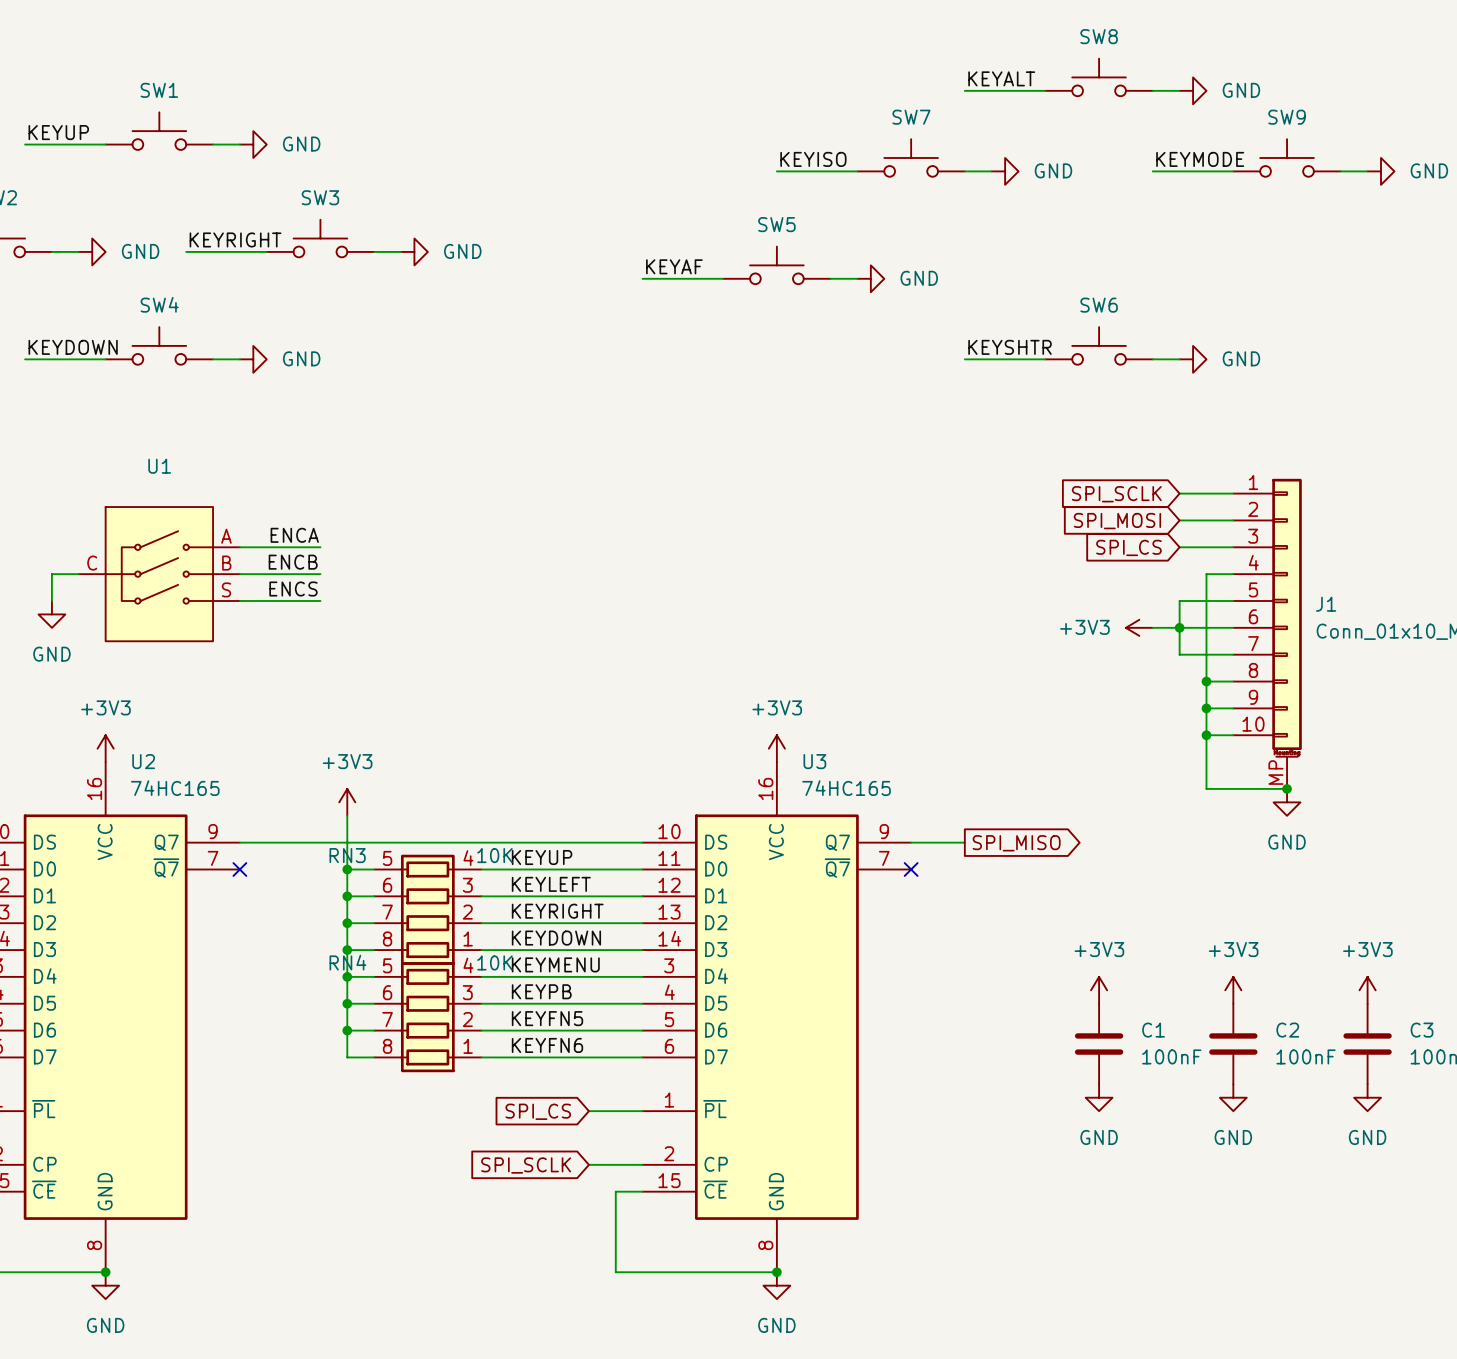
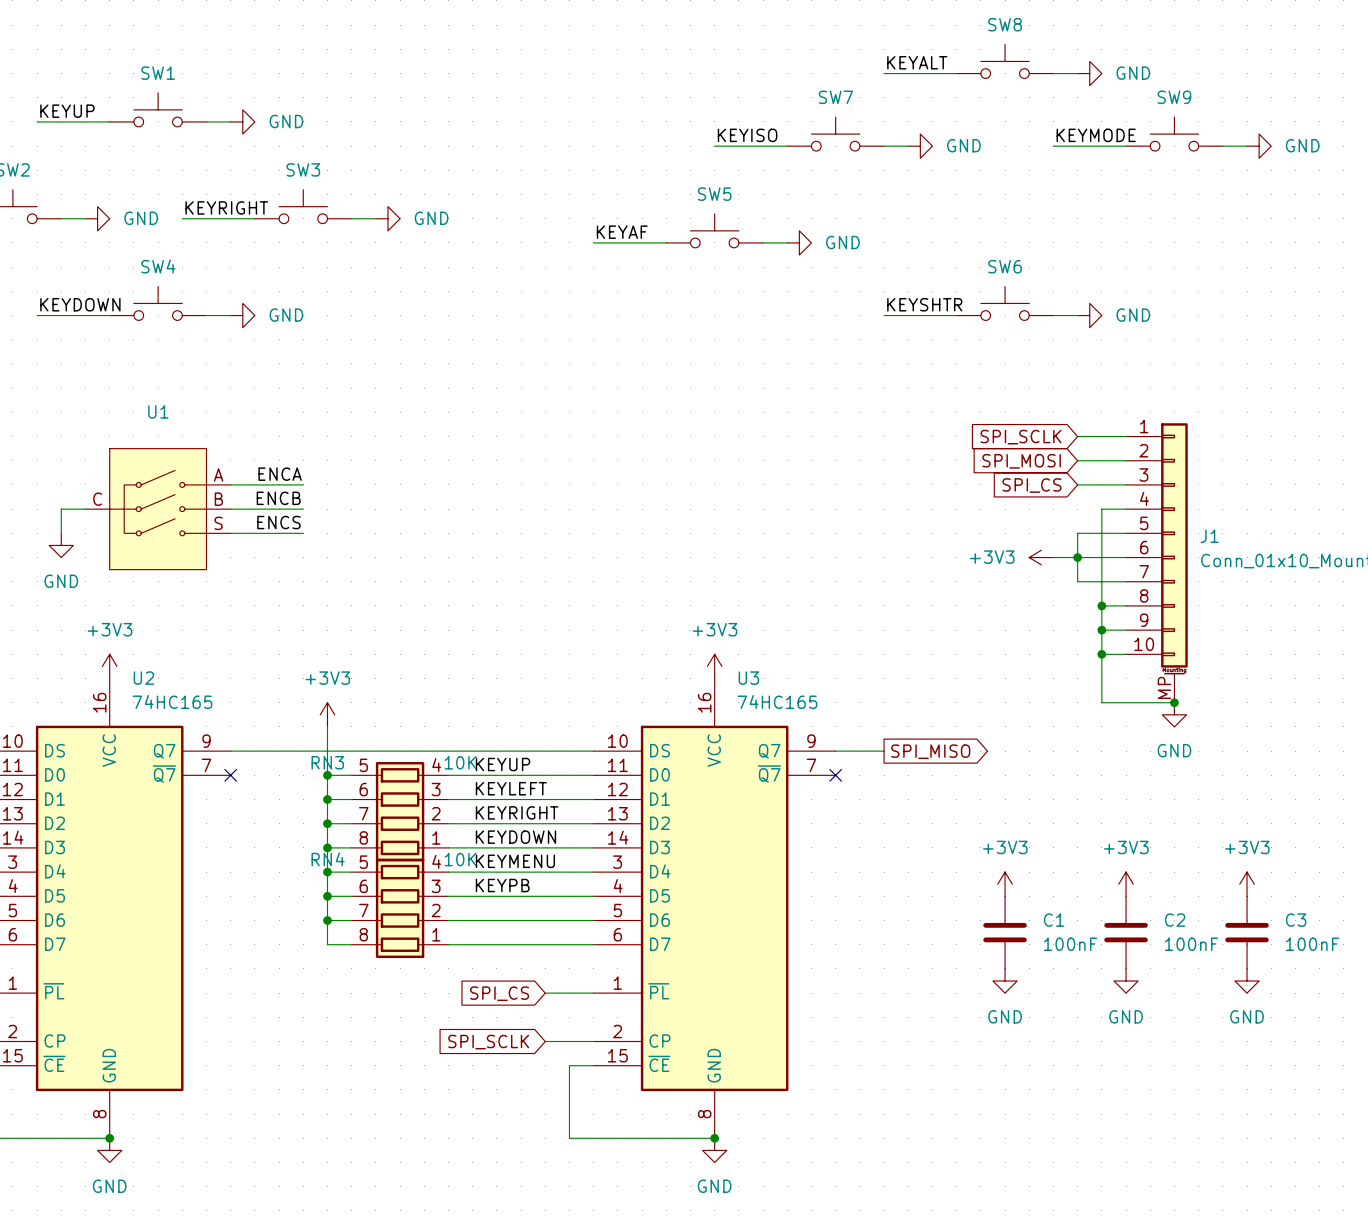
label: KEYFN5 (547, 1018) -> none
label: KEYFN6 (547, 1045) -> none

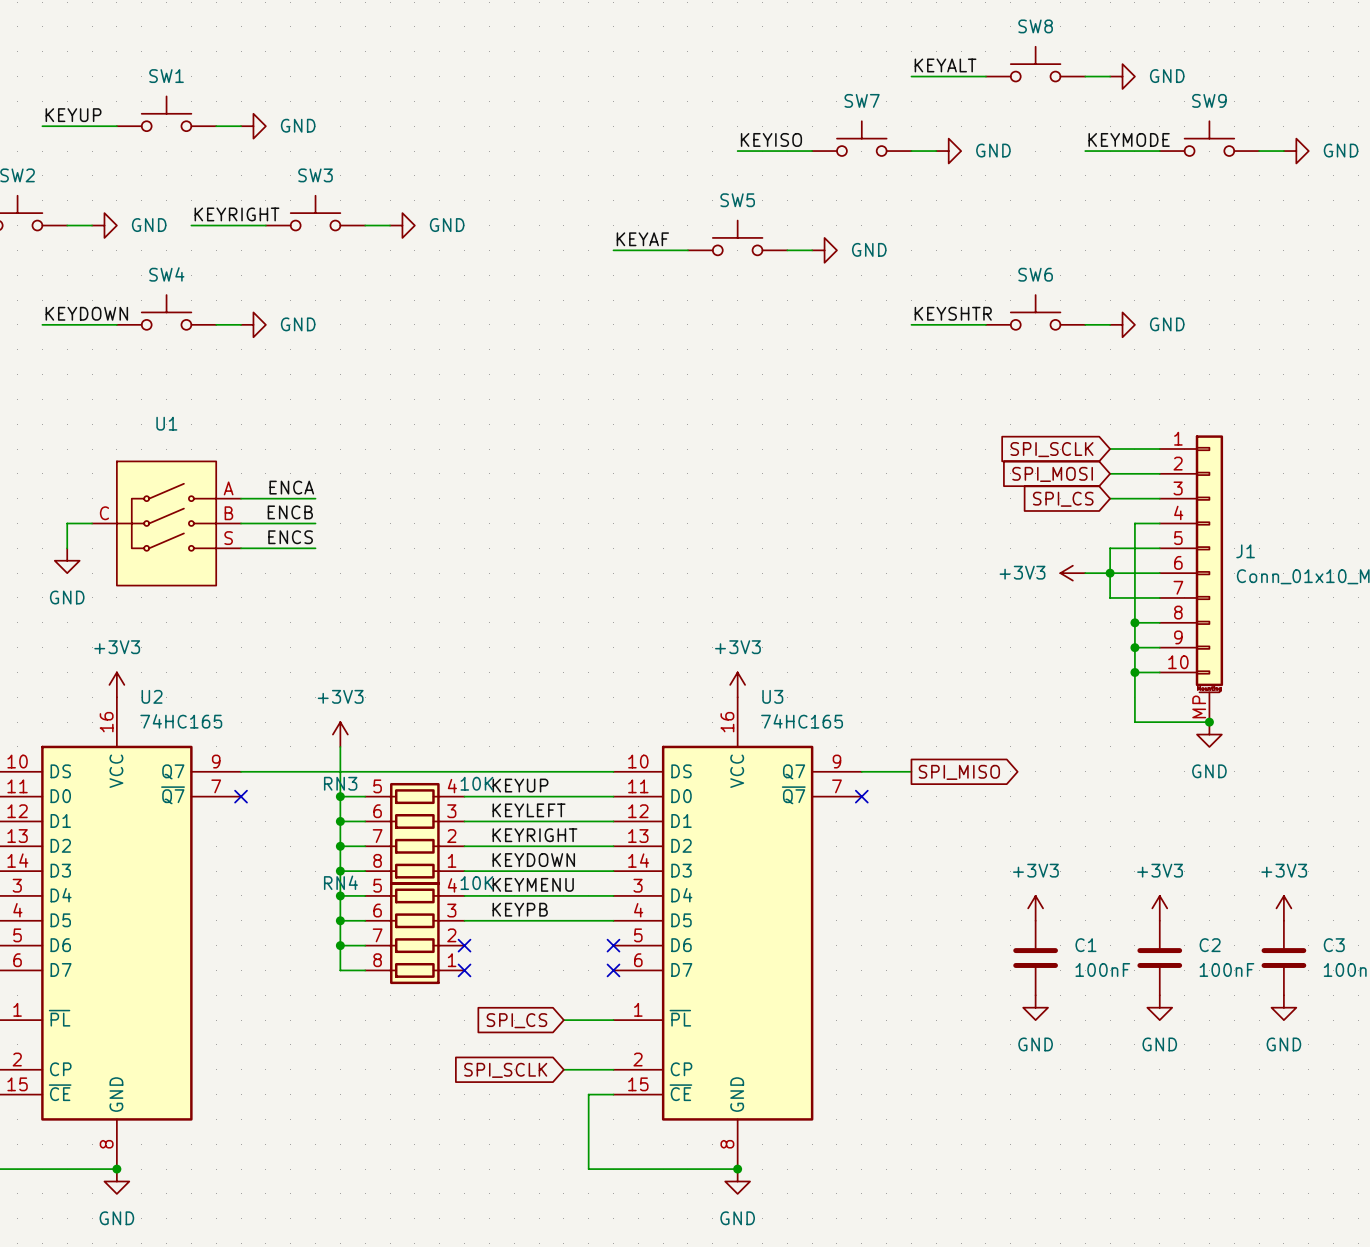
wire: (448, 920) (593, 920) -> none
no-connect mark: none -> (464, 945)
no-connect mark: none -> (613, 945)
wire: (448, 944) (593, 944) -> none
no-connect mark: none -> (464, 970)
no-connect mark: none -> (613, 970)

